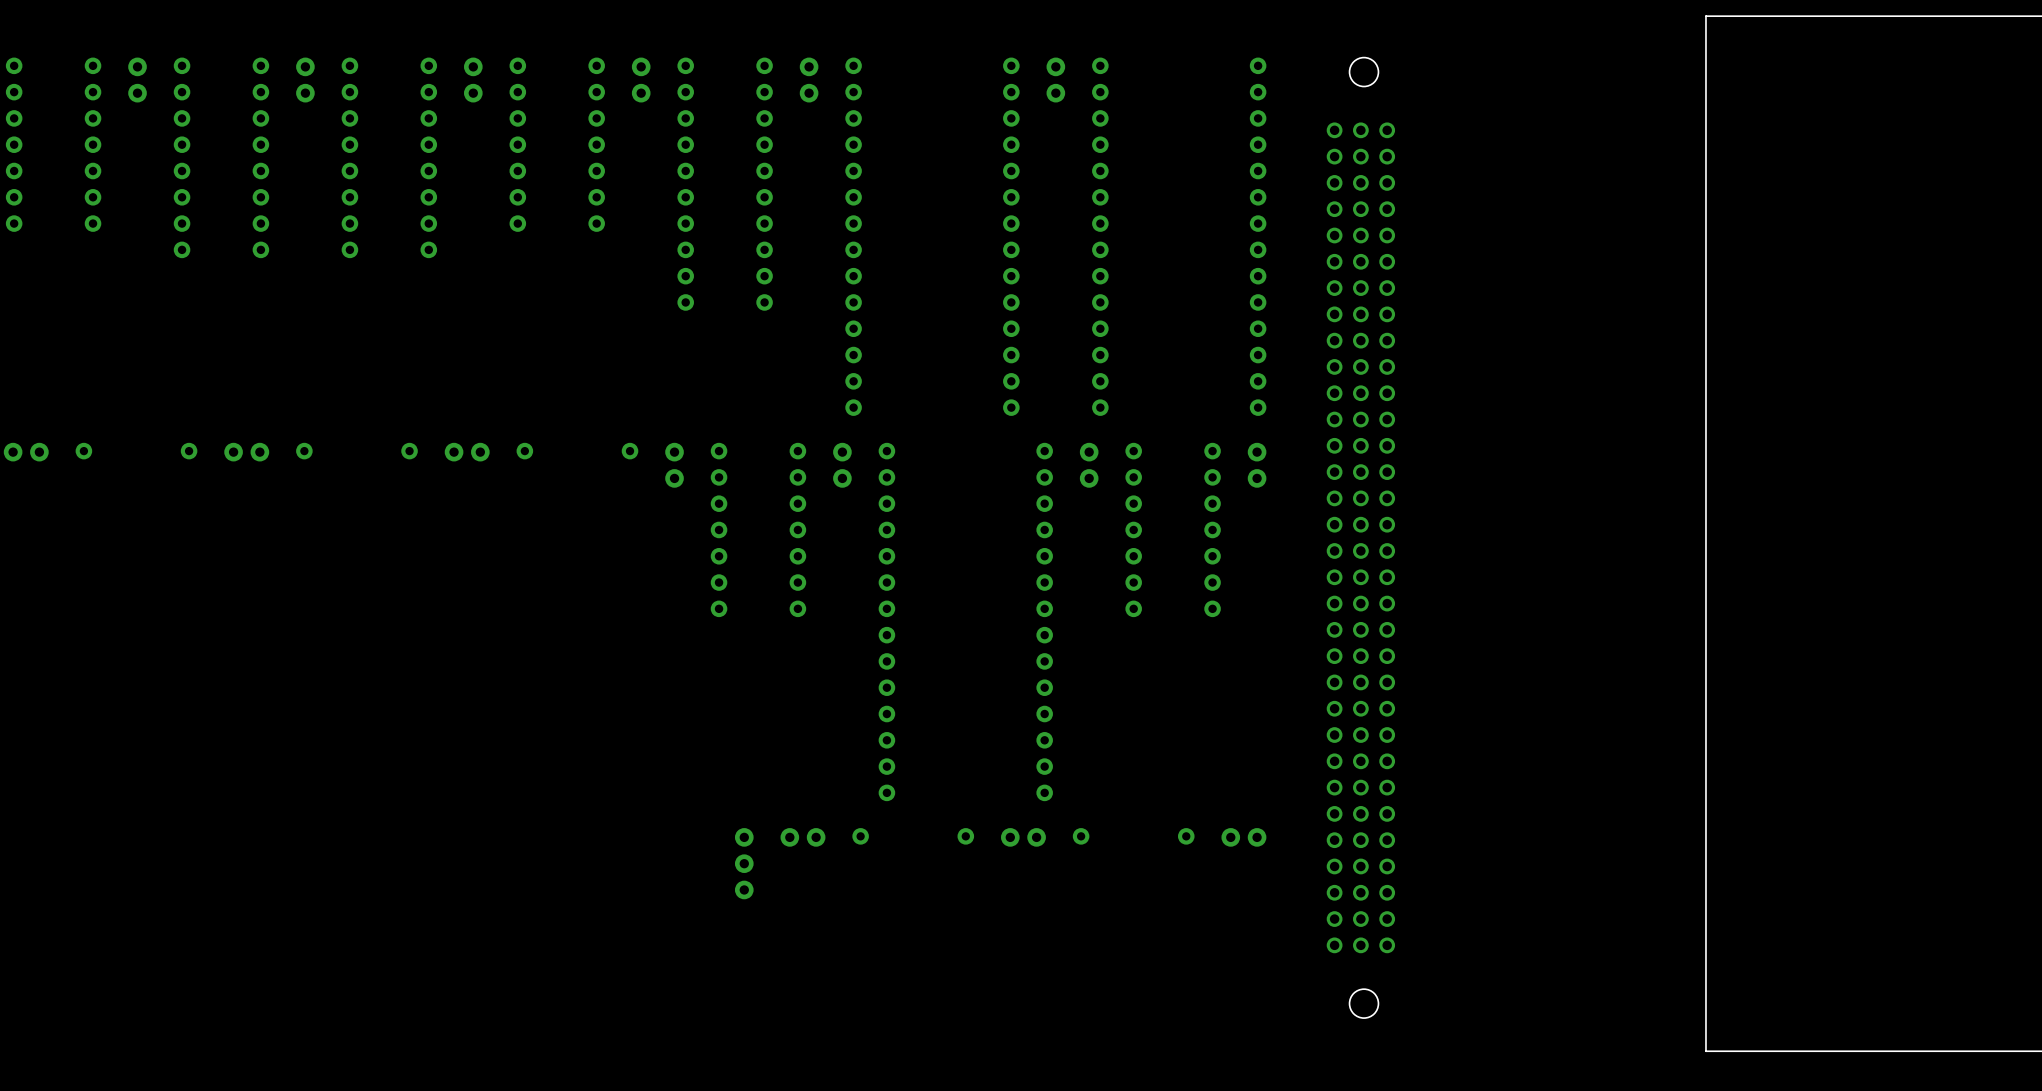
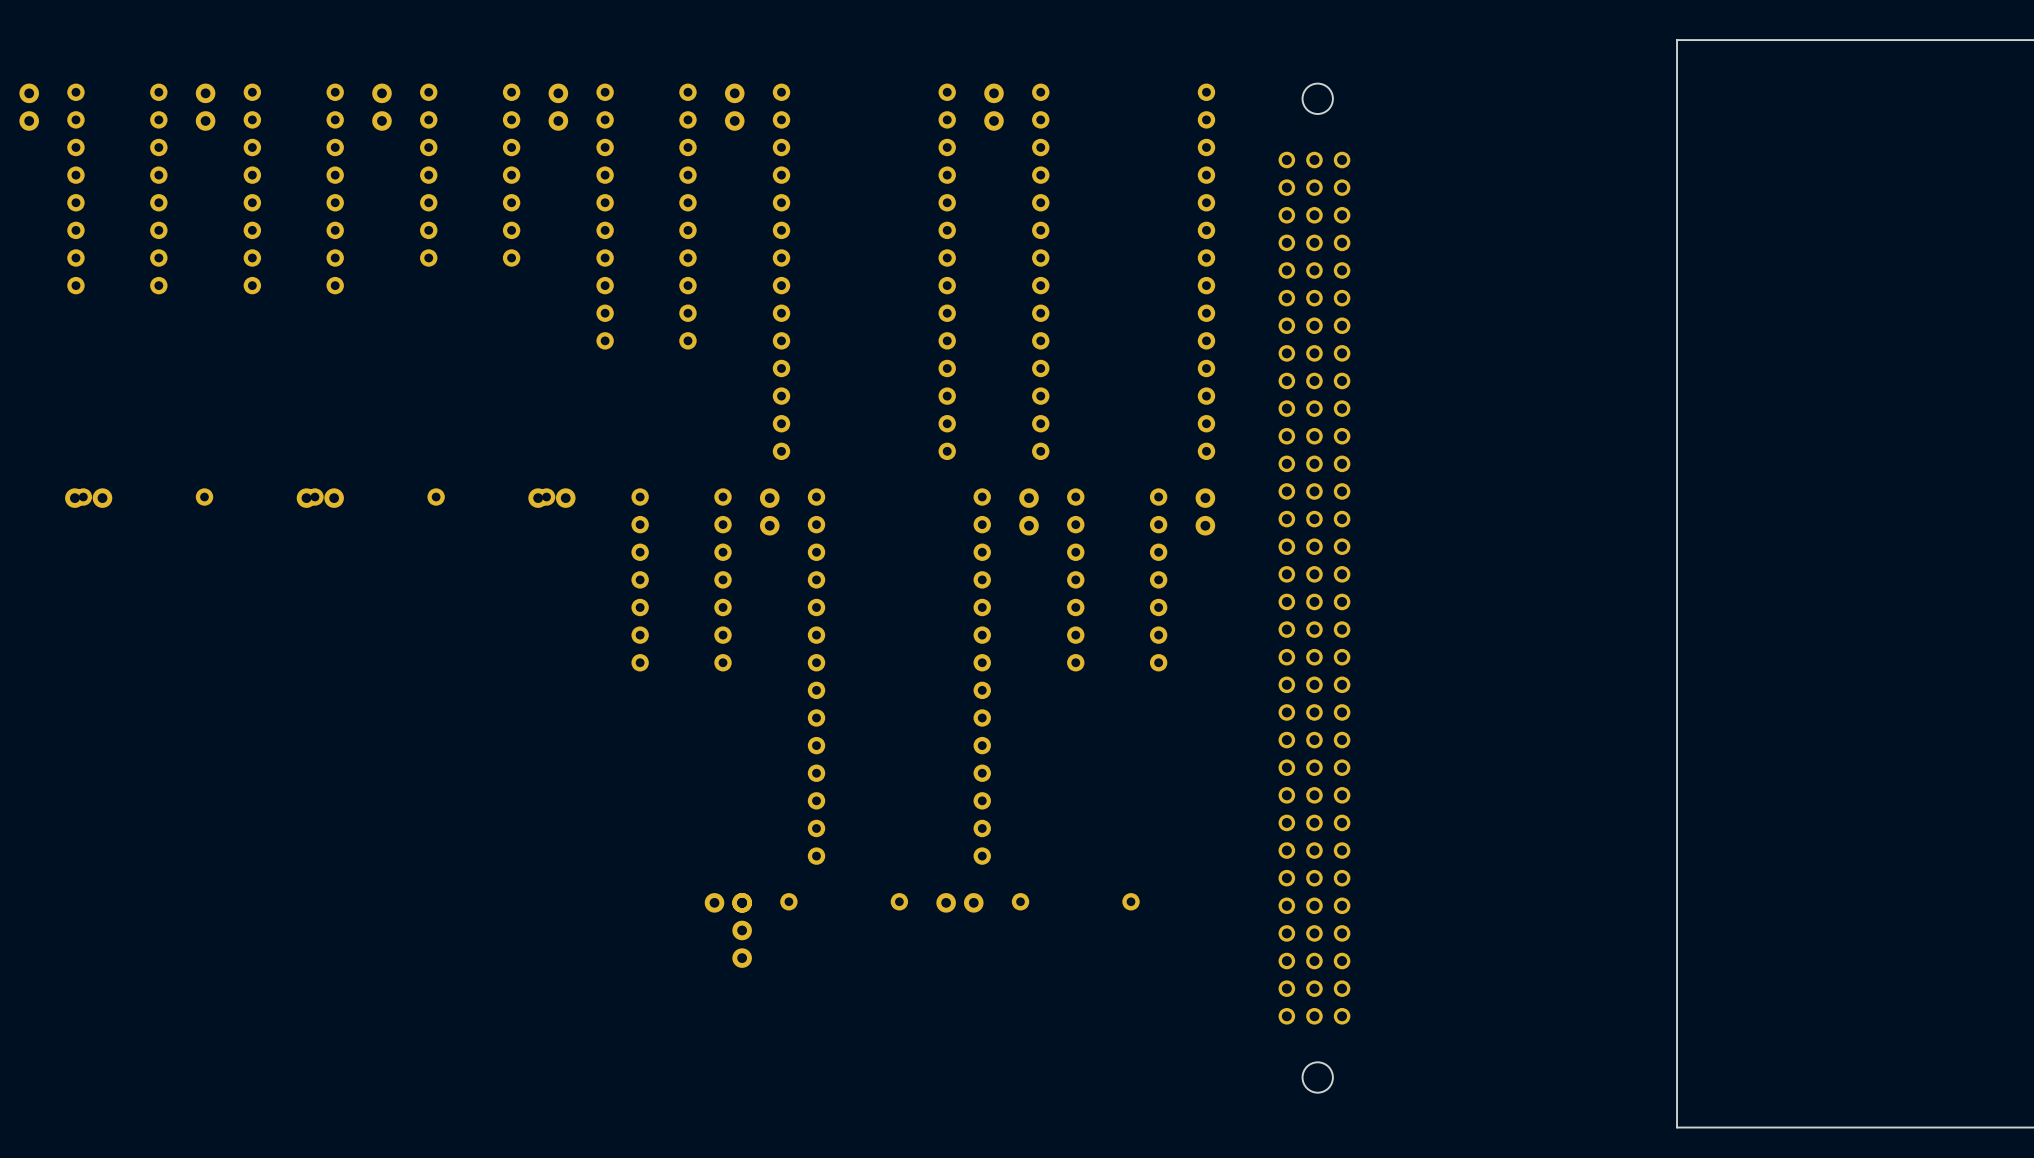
part position: (246, 452) -> (88, 498)
part position: (467, 452) -> (320, 498)
part rotation: 0° (674, 465) -> 90° clockwise (551, 498)
part position: (674, 465) -> (551, 498)
part: (1243, 837) -> none
part position: (744, 863) -> (742, 930)

